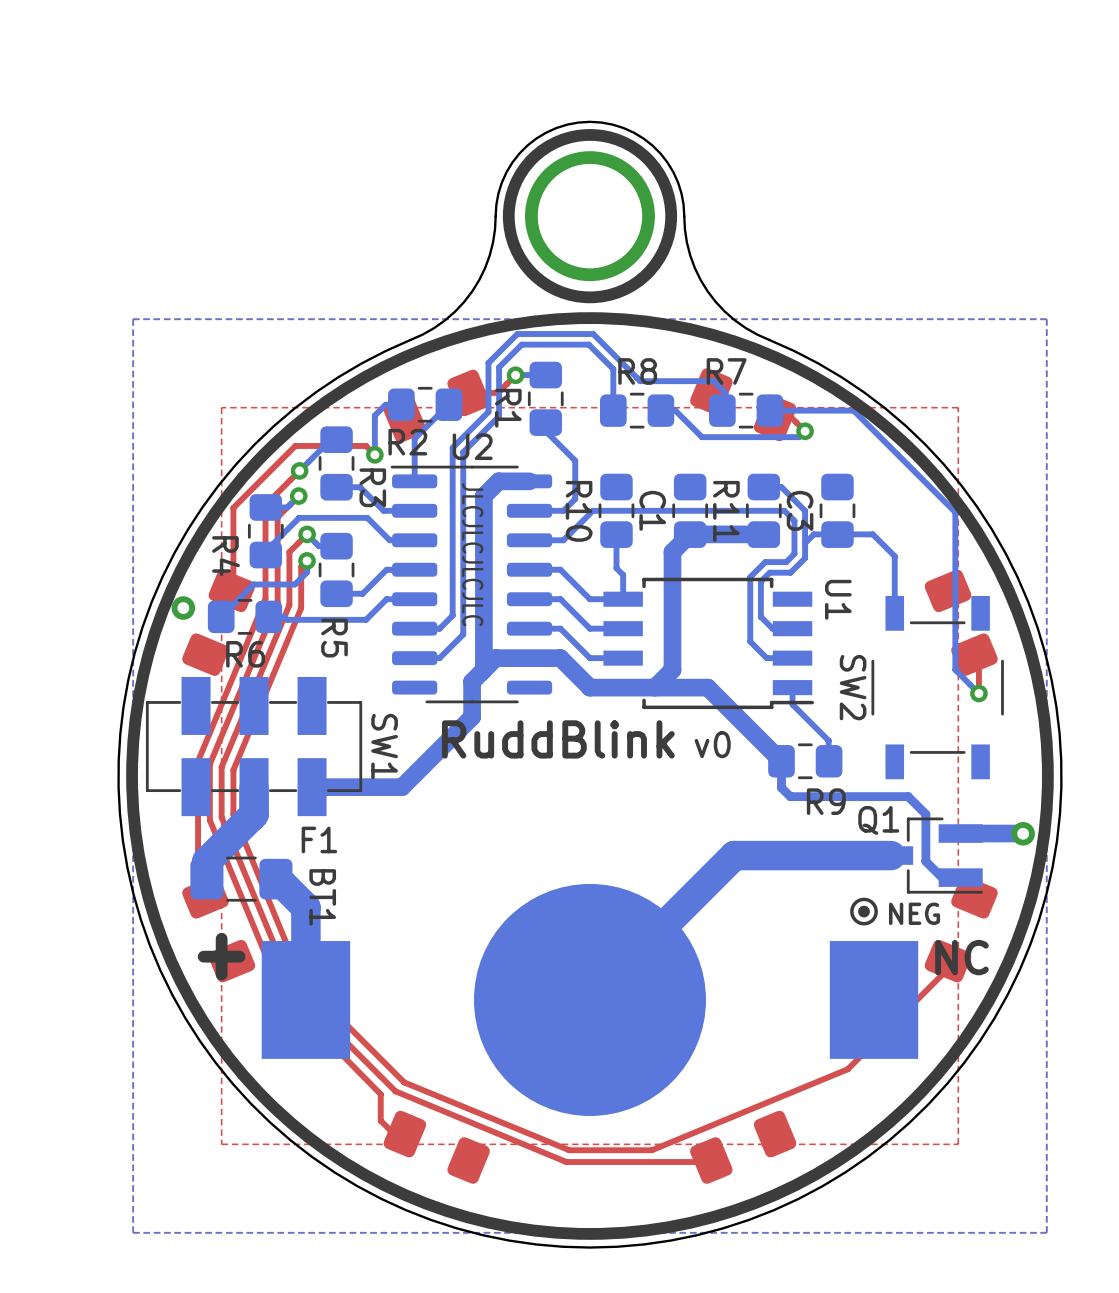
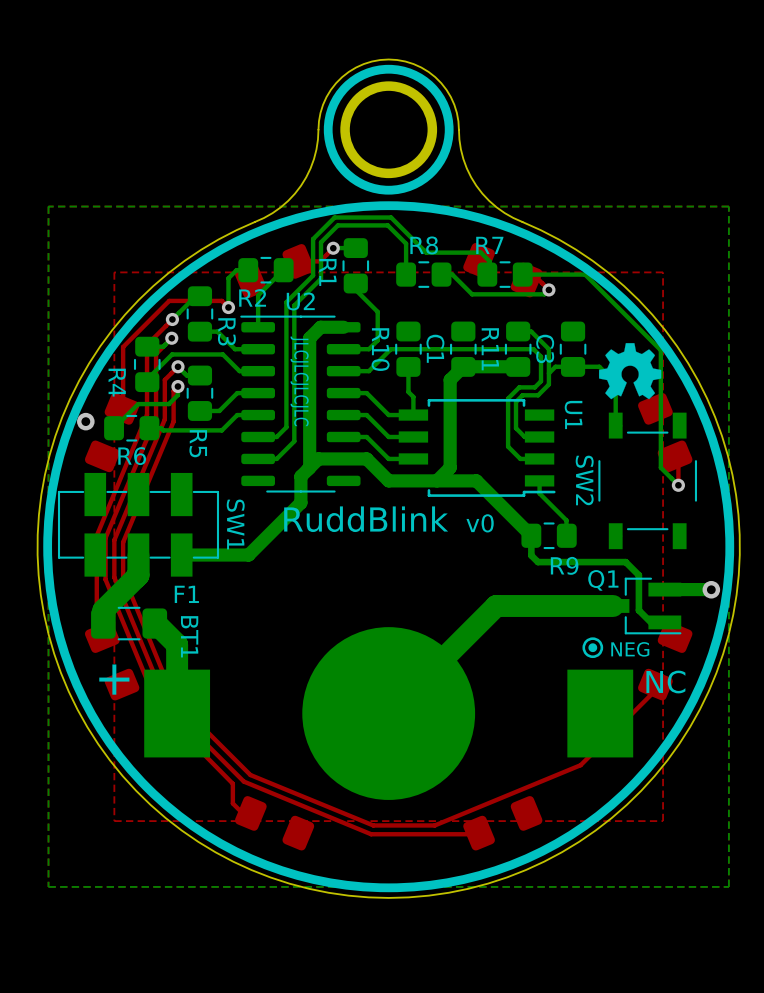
drawing: none -> [598, 343, 662, 400]

